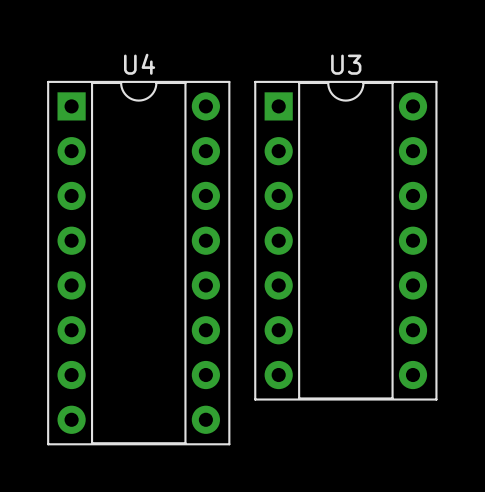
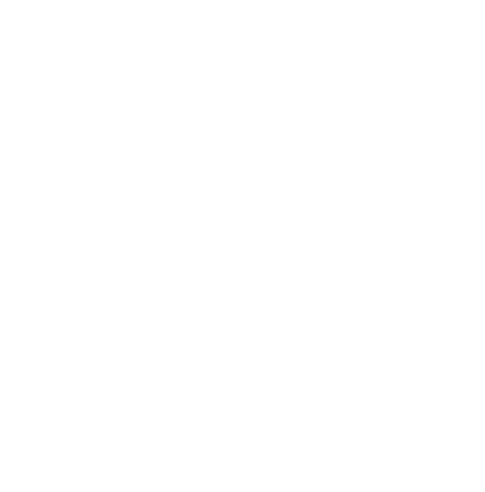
U3: (345, 240) -> none
U4: (138, 263) -> none

